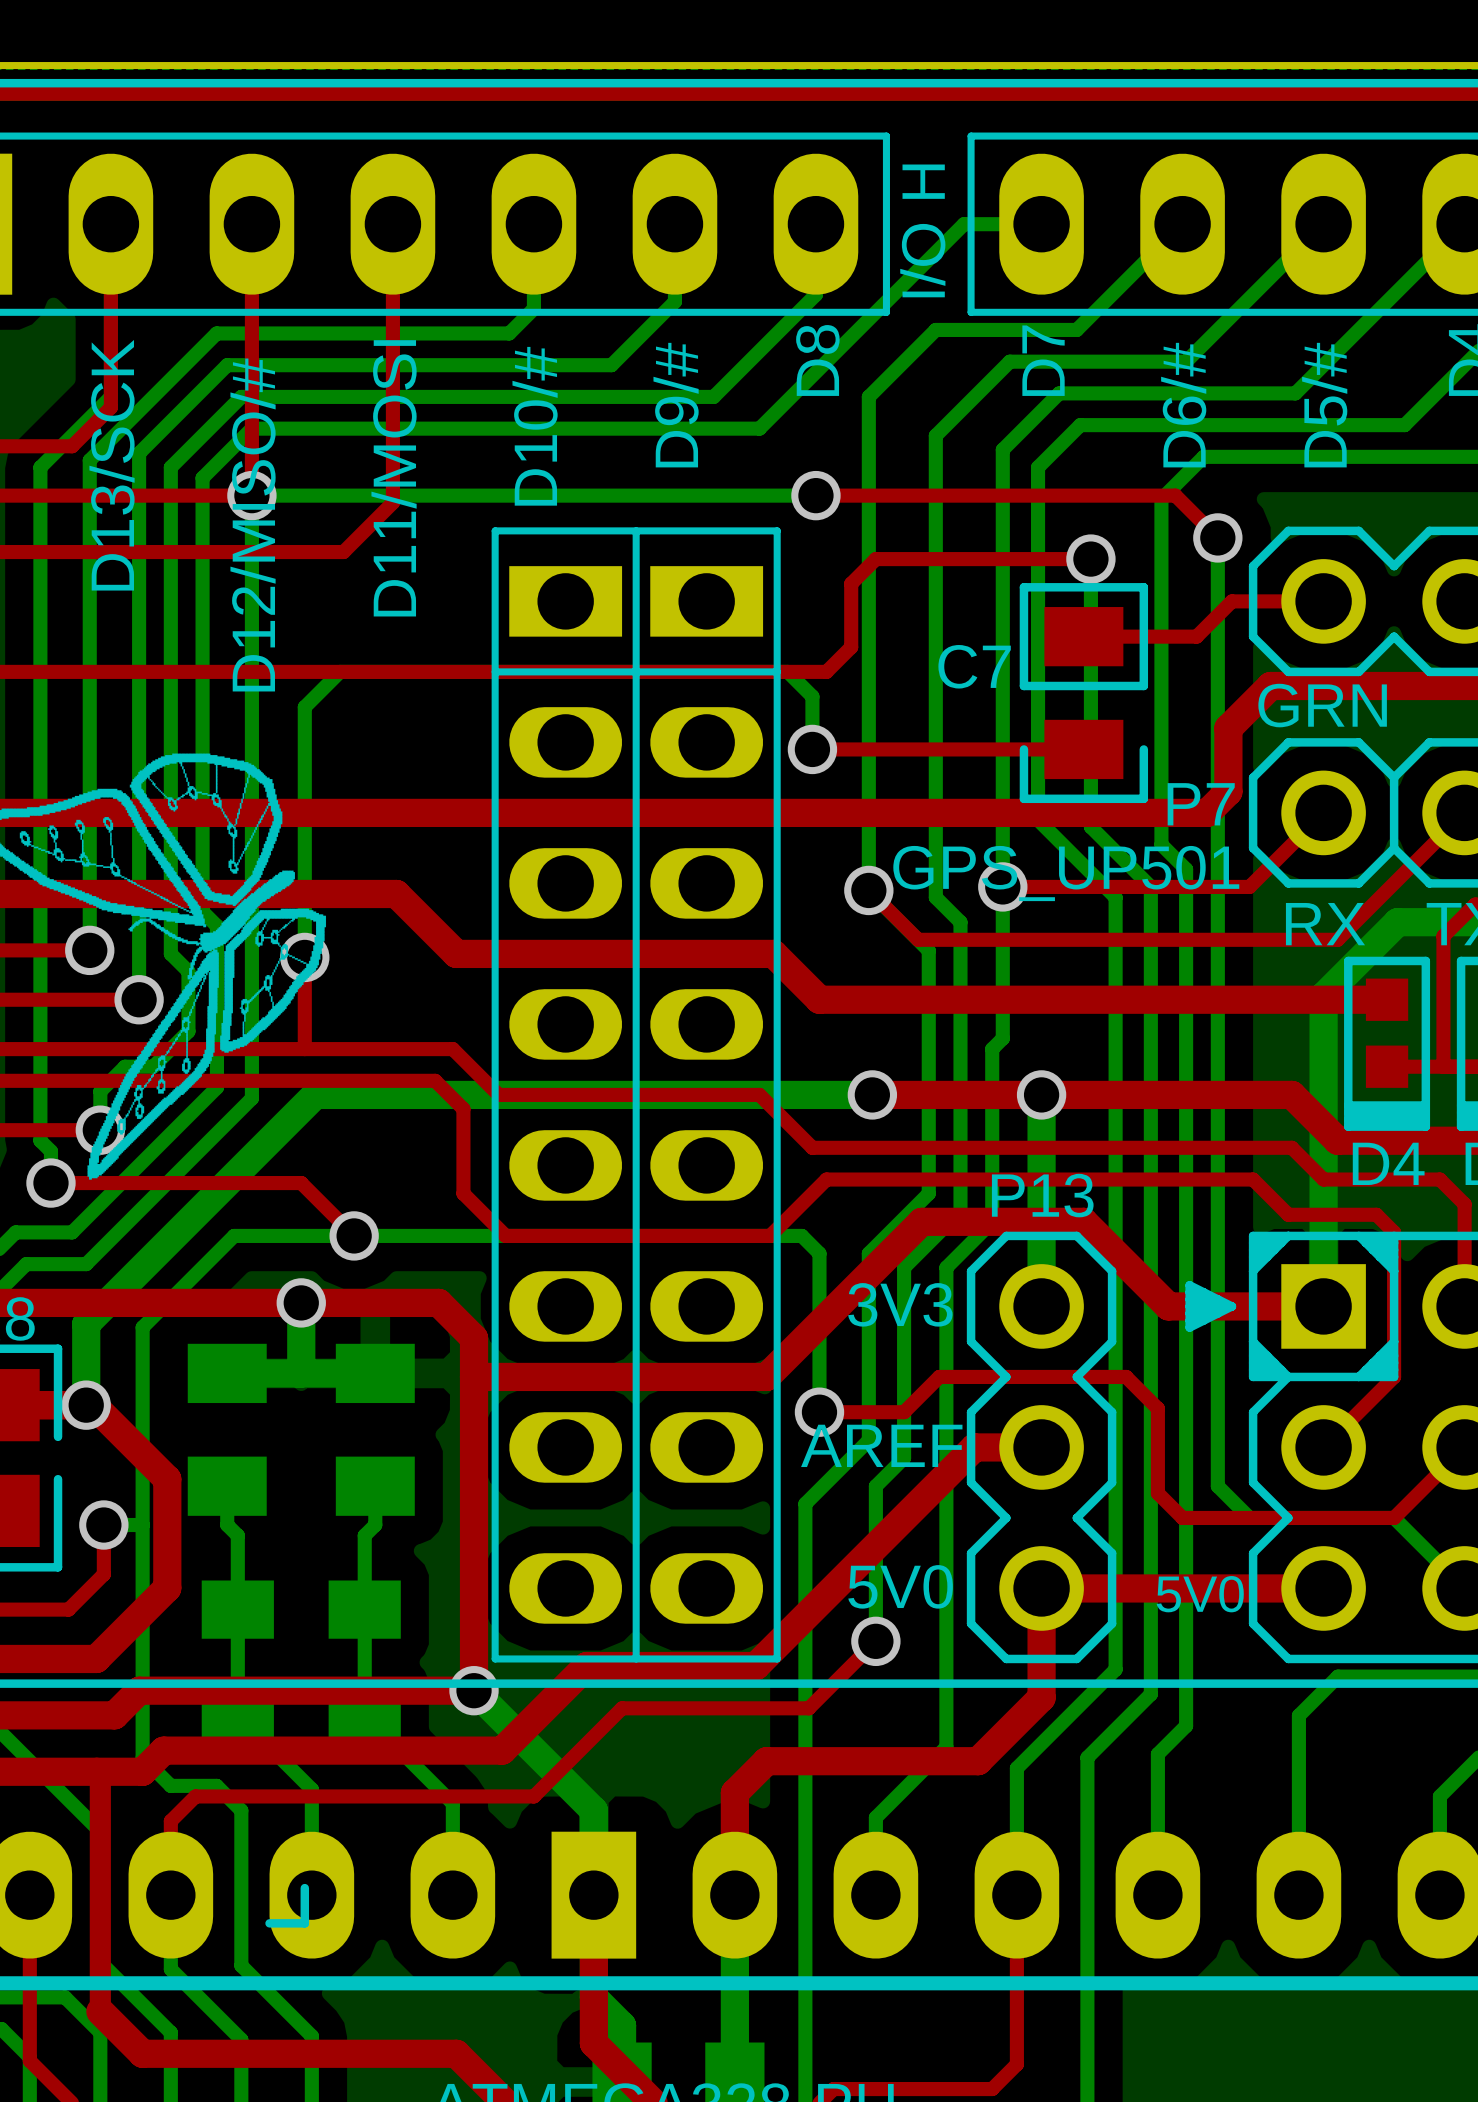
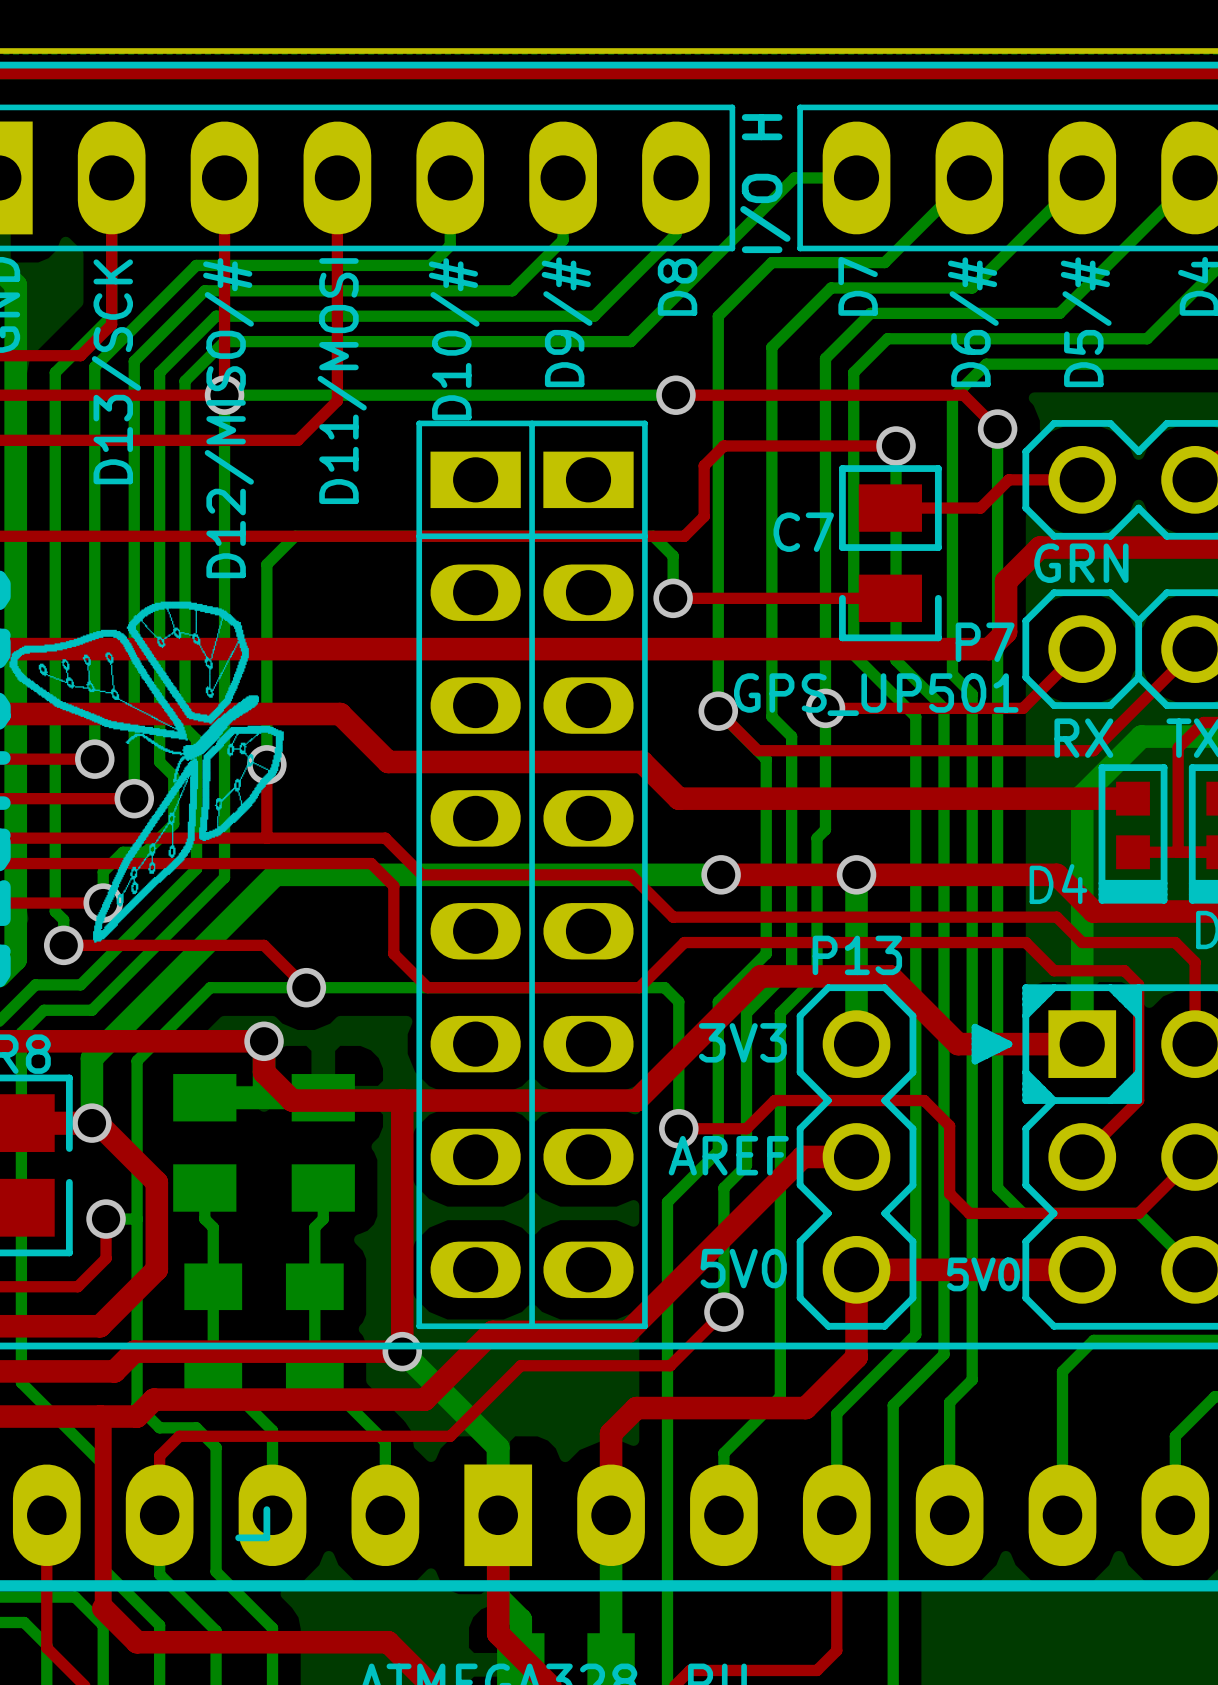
D4 name position: D4 (1388, 1163) -> D4 (1058, 884)
top track: (301, 1302) (438, 1302) (474, 1338) (474, 1376) -> (264, 1041) (264, 1072) (292, 1100) (402, 1100)

